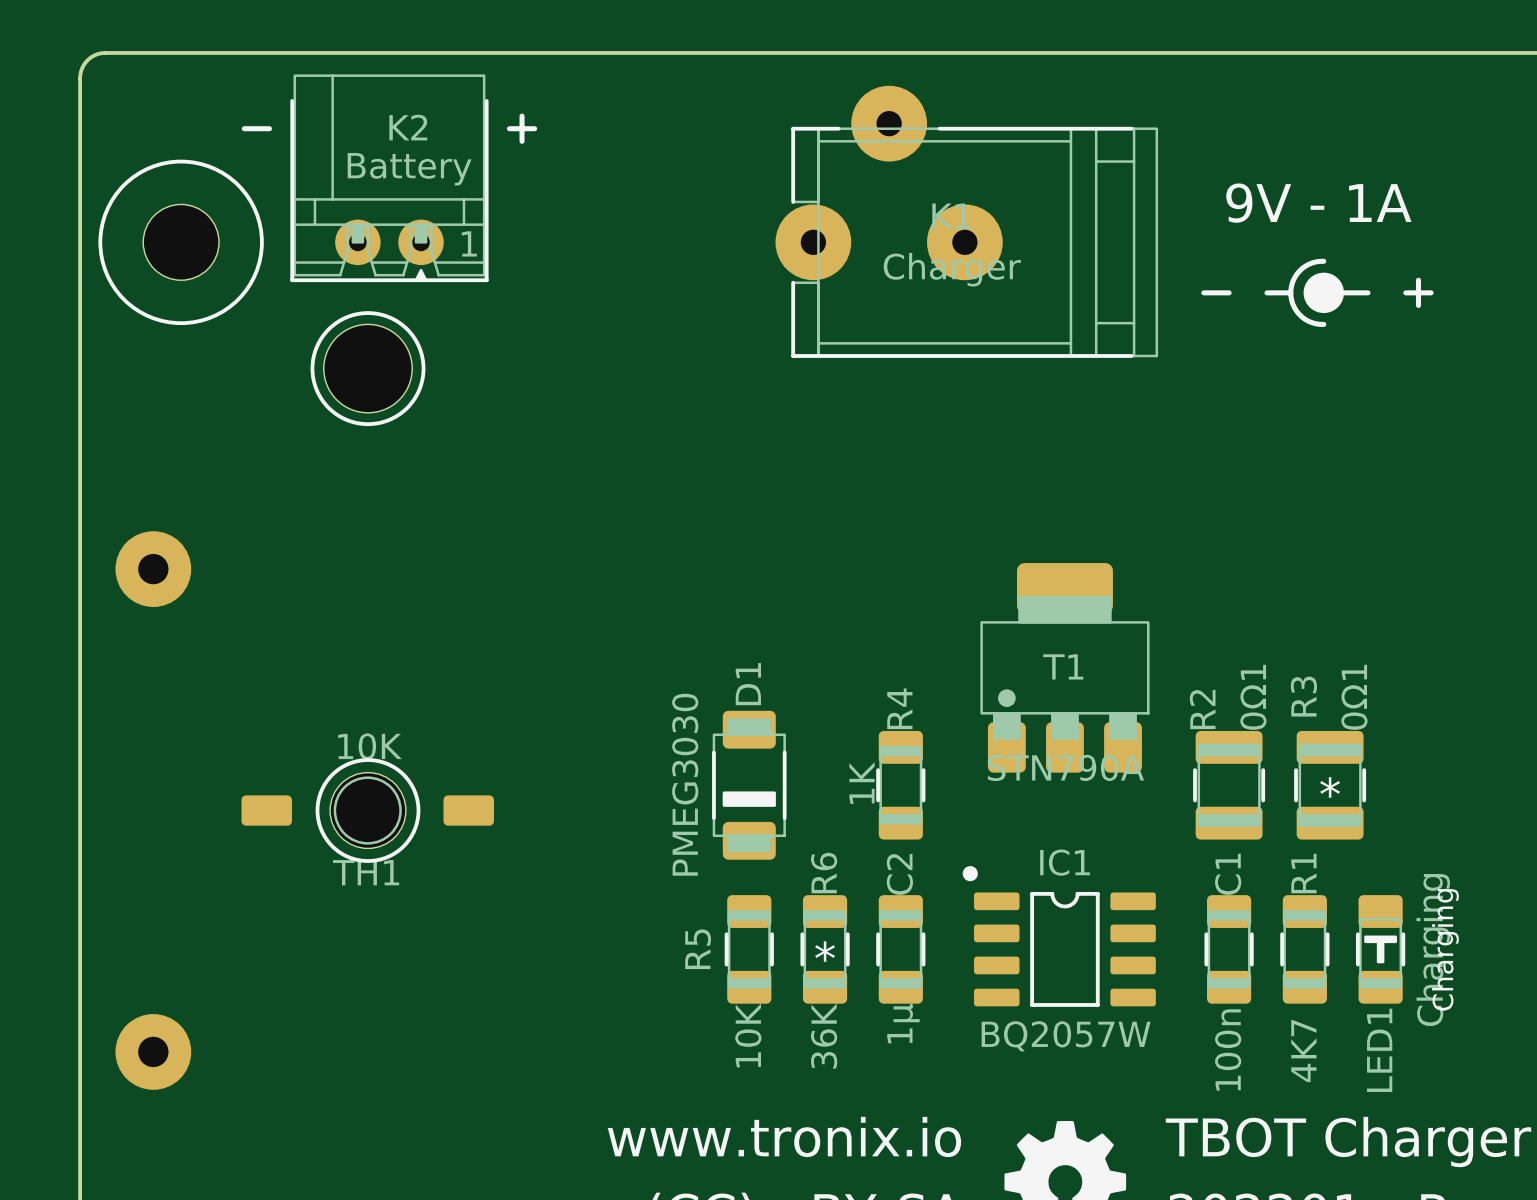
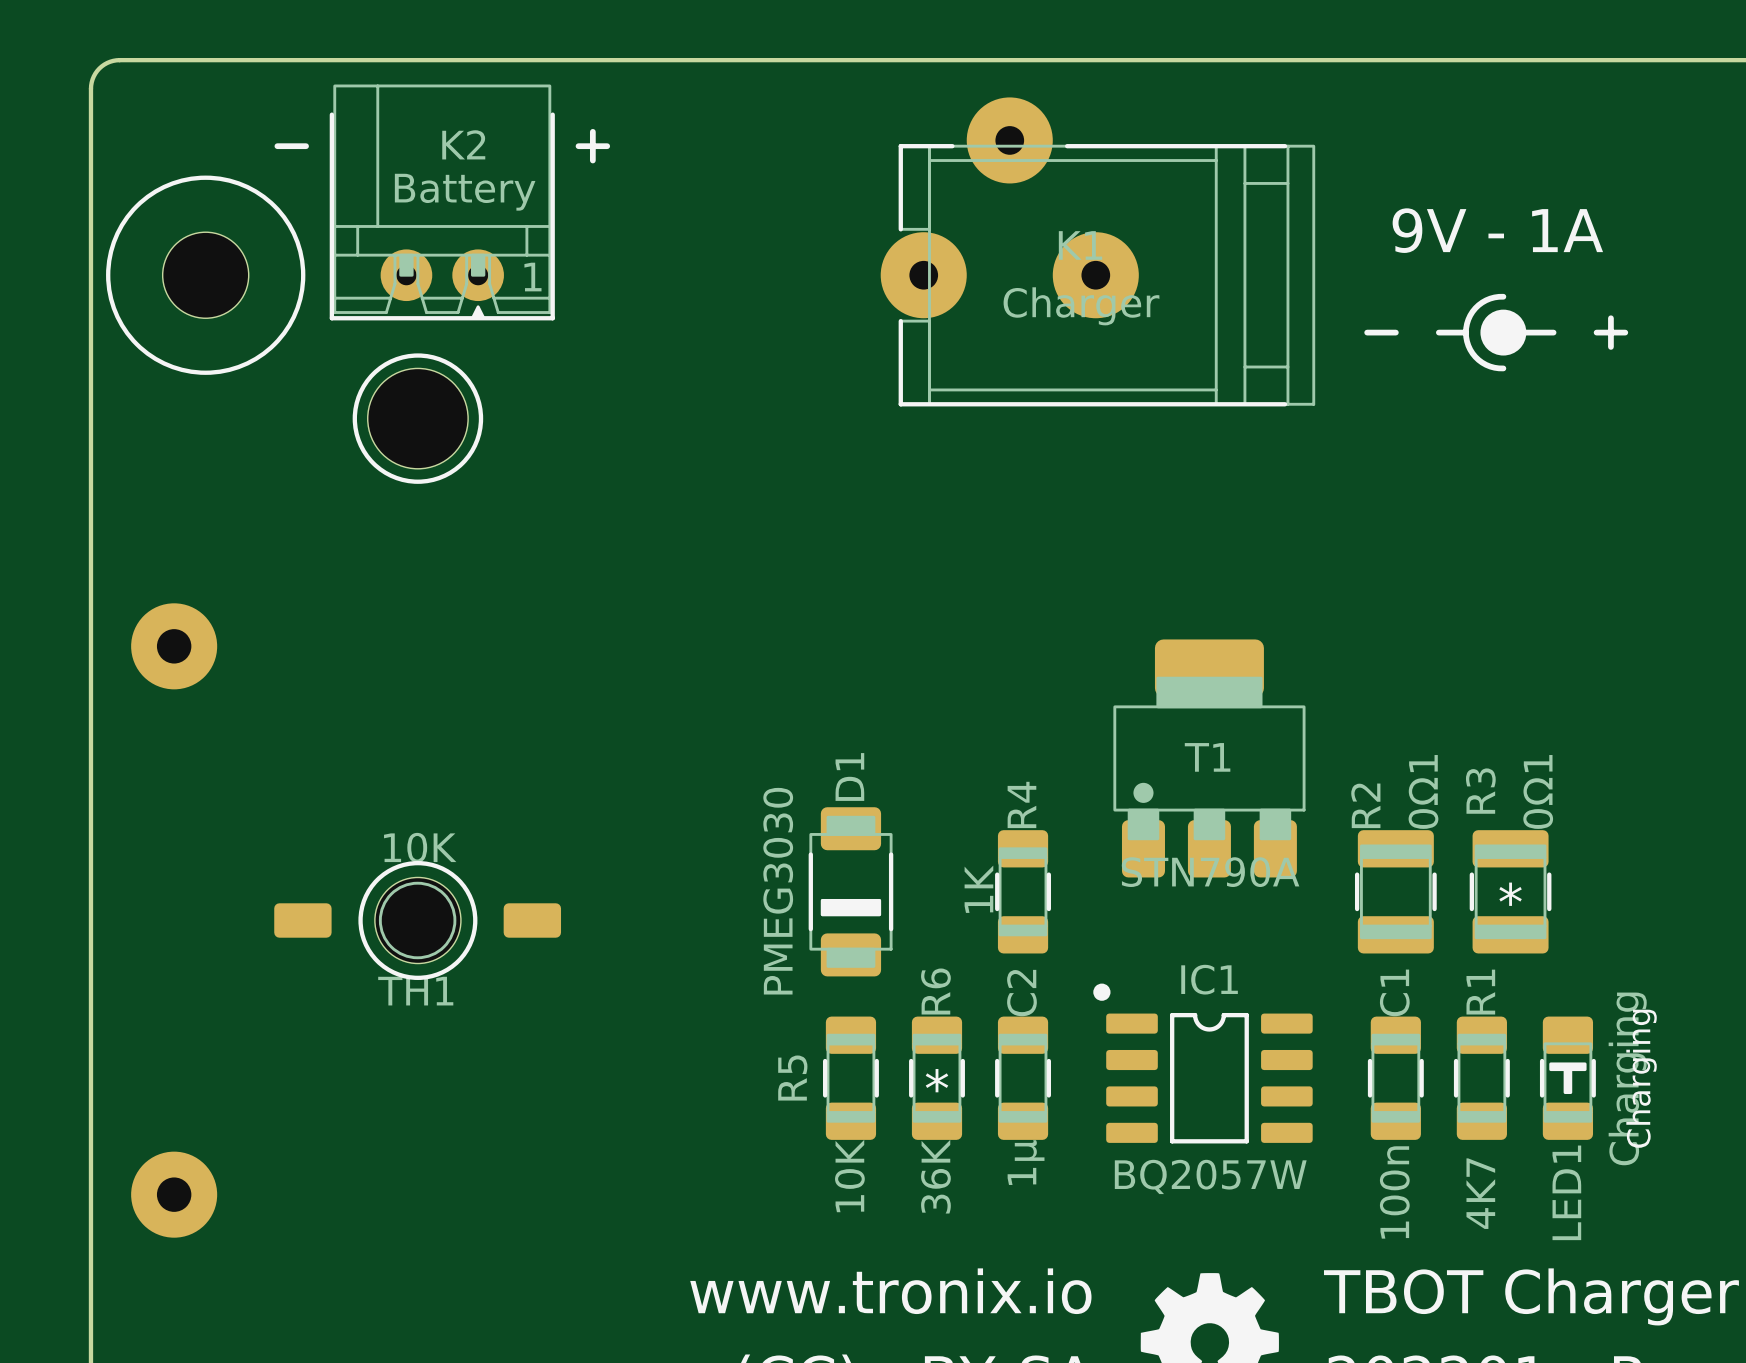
part footprint: [98, 159, 264, 326] -> [106, 175, 306, 375]

